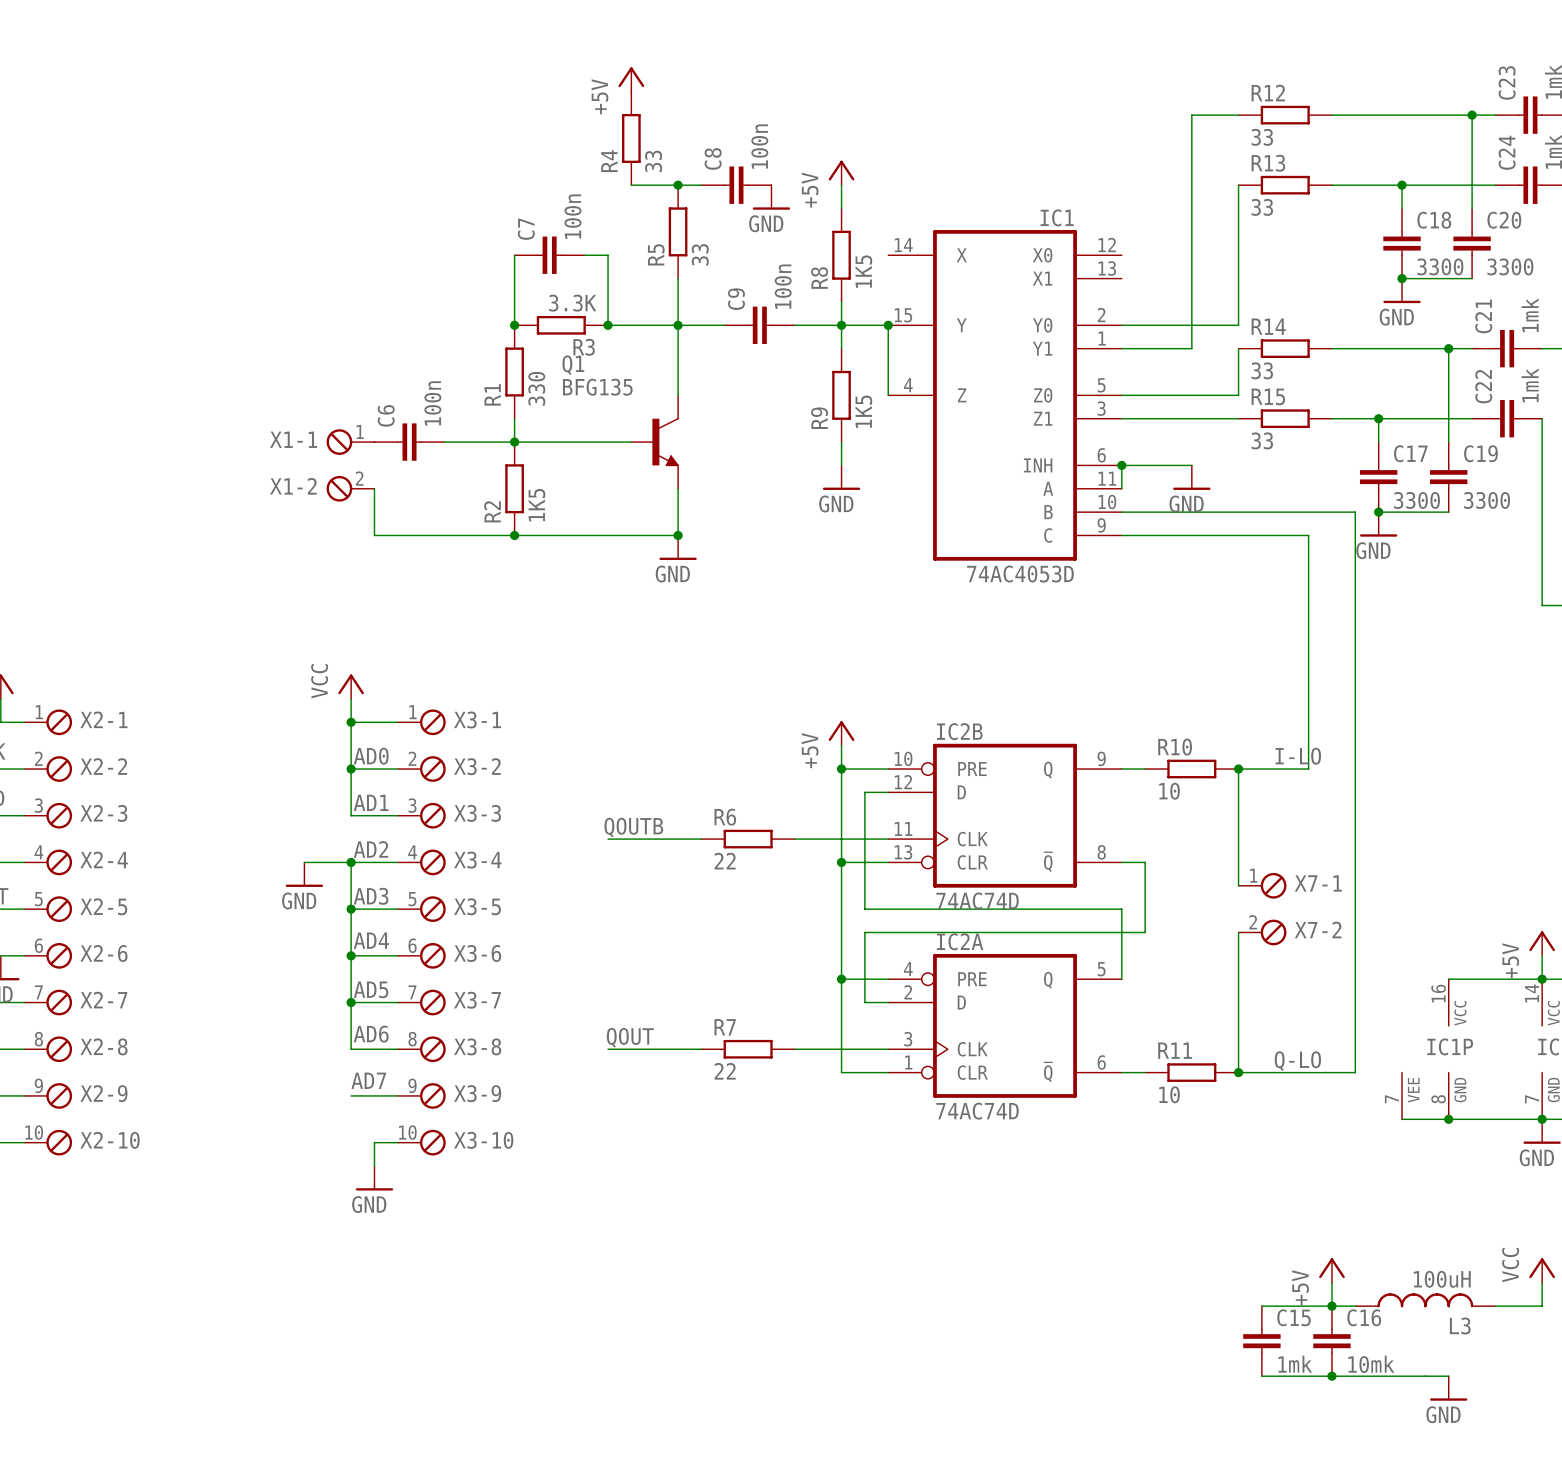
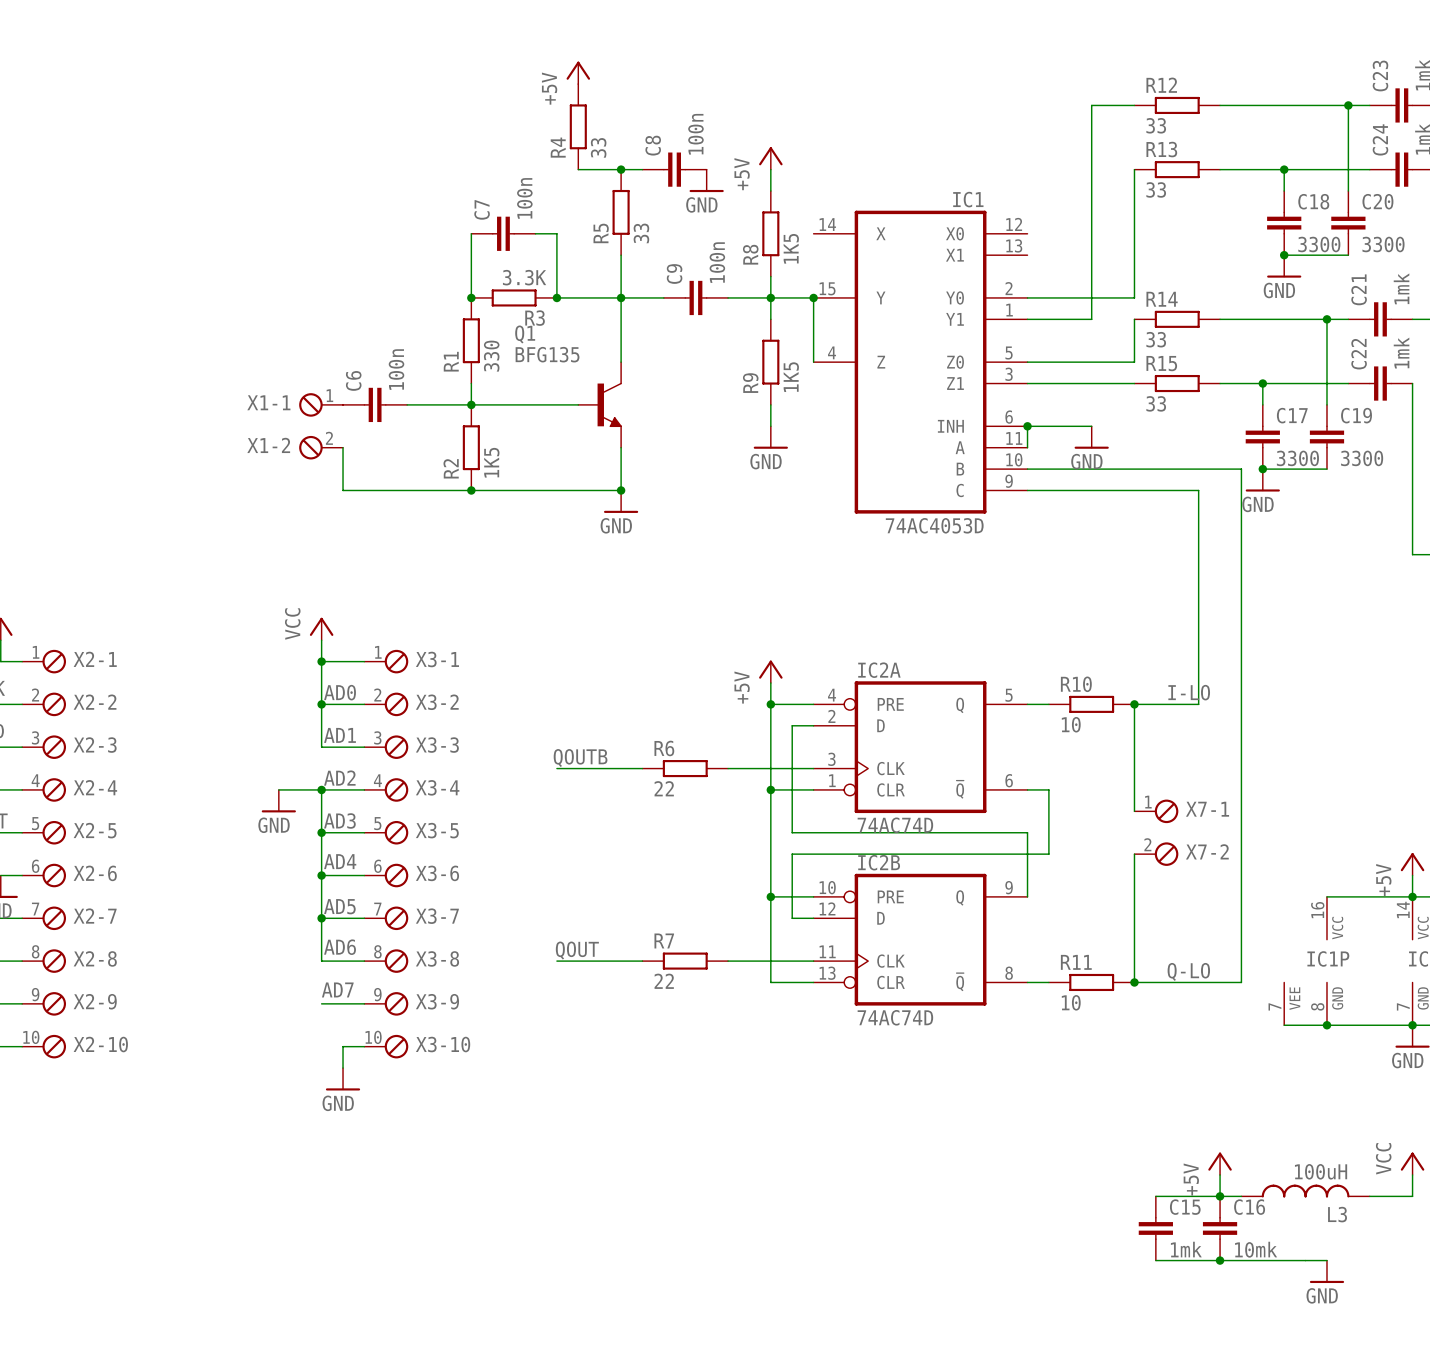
IC2B position: (1005, 815) -> (920, 939)
IC2A position: (1005, 1025) -> (920, 747)

